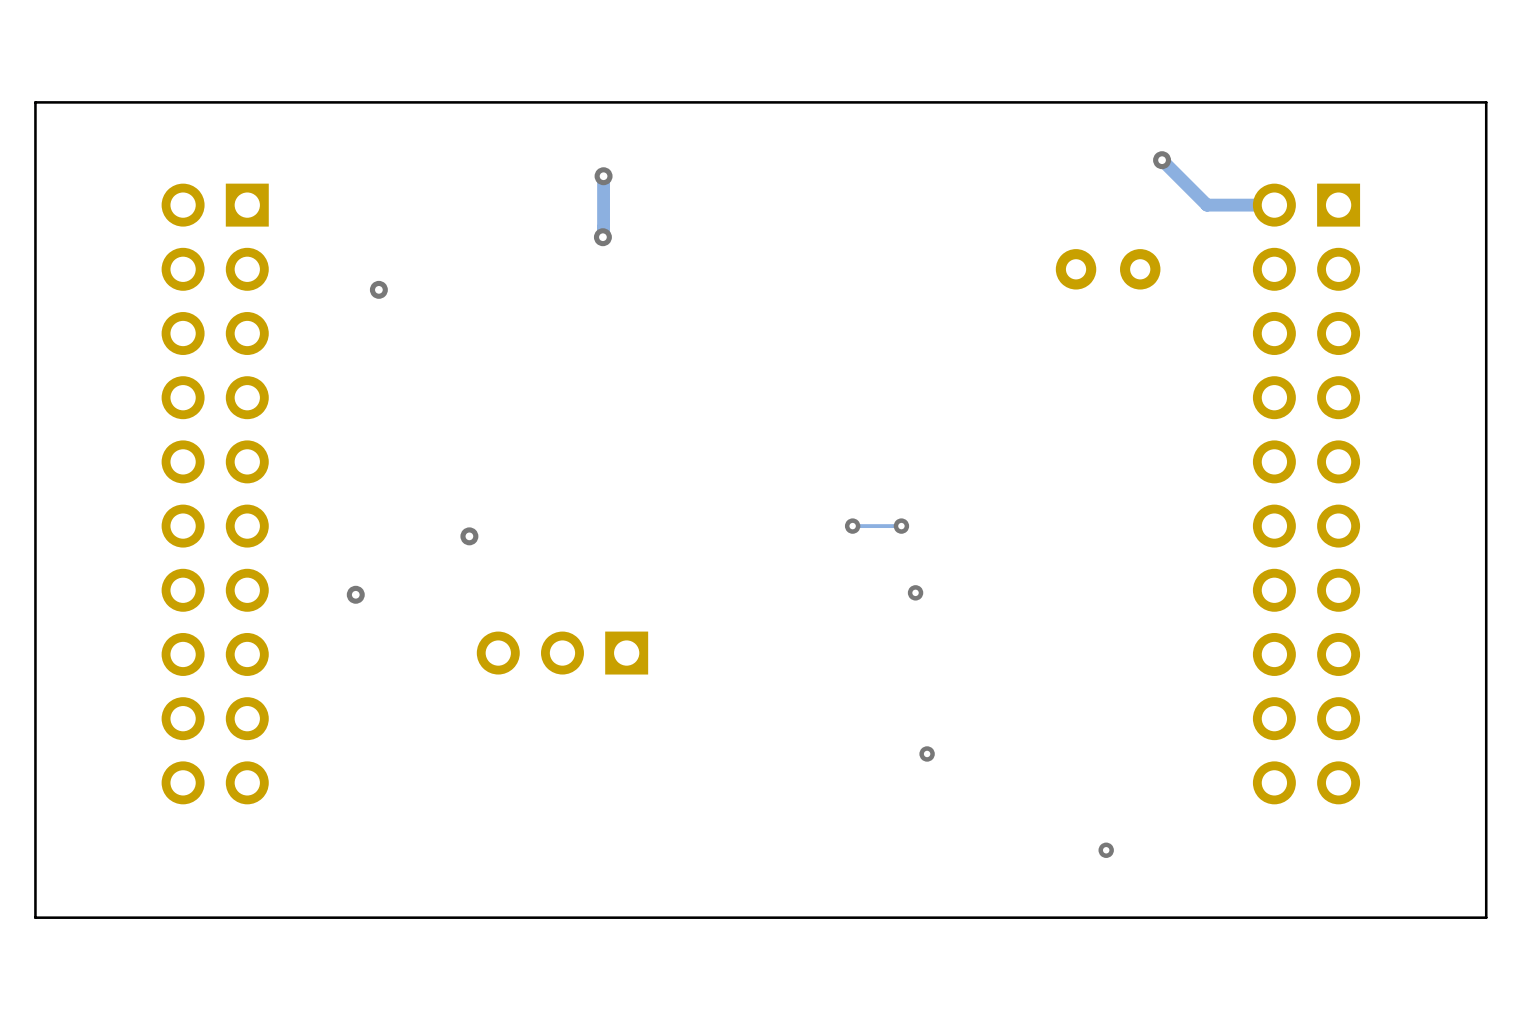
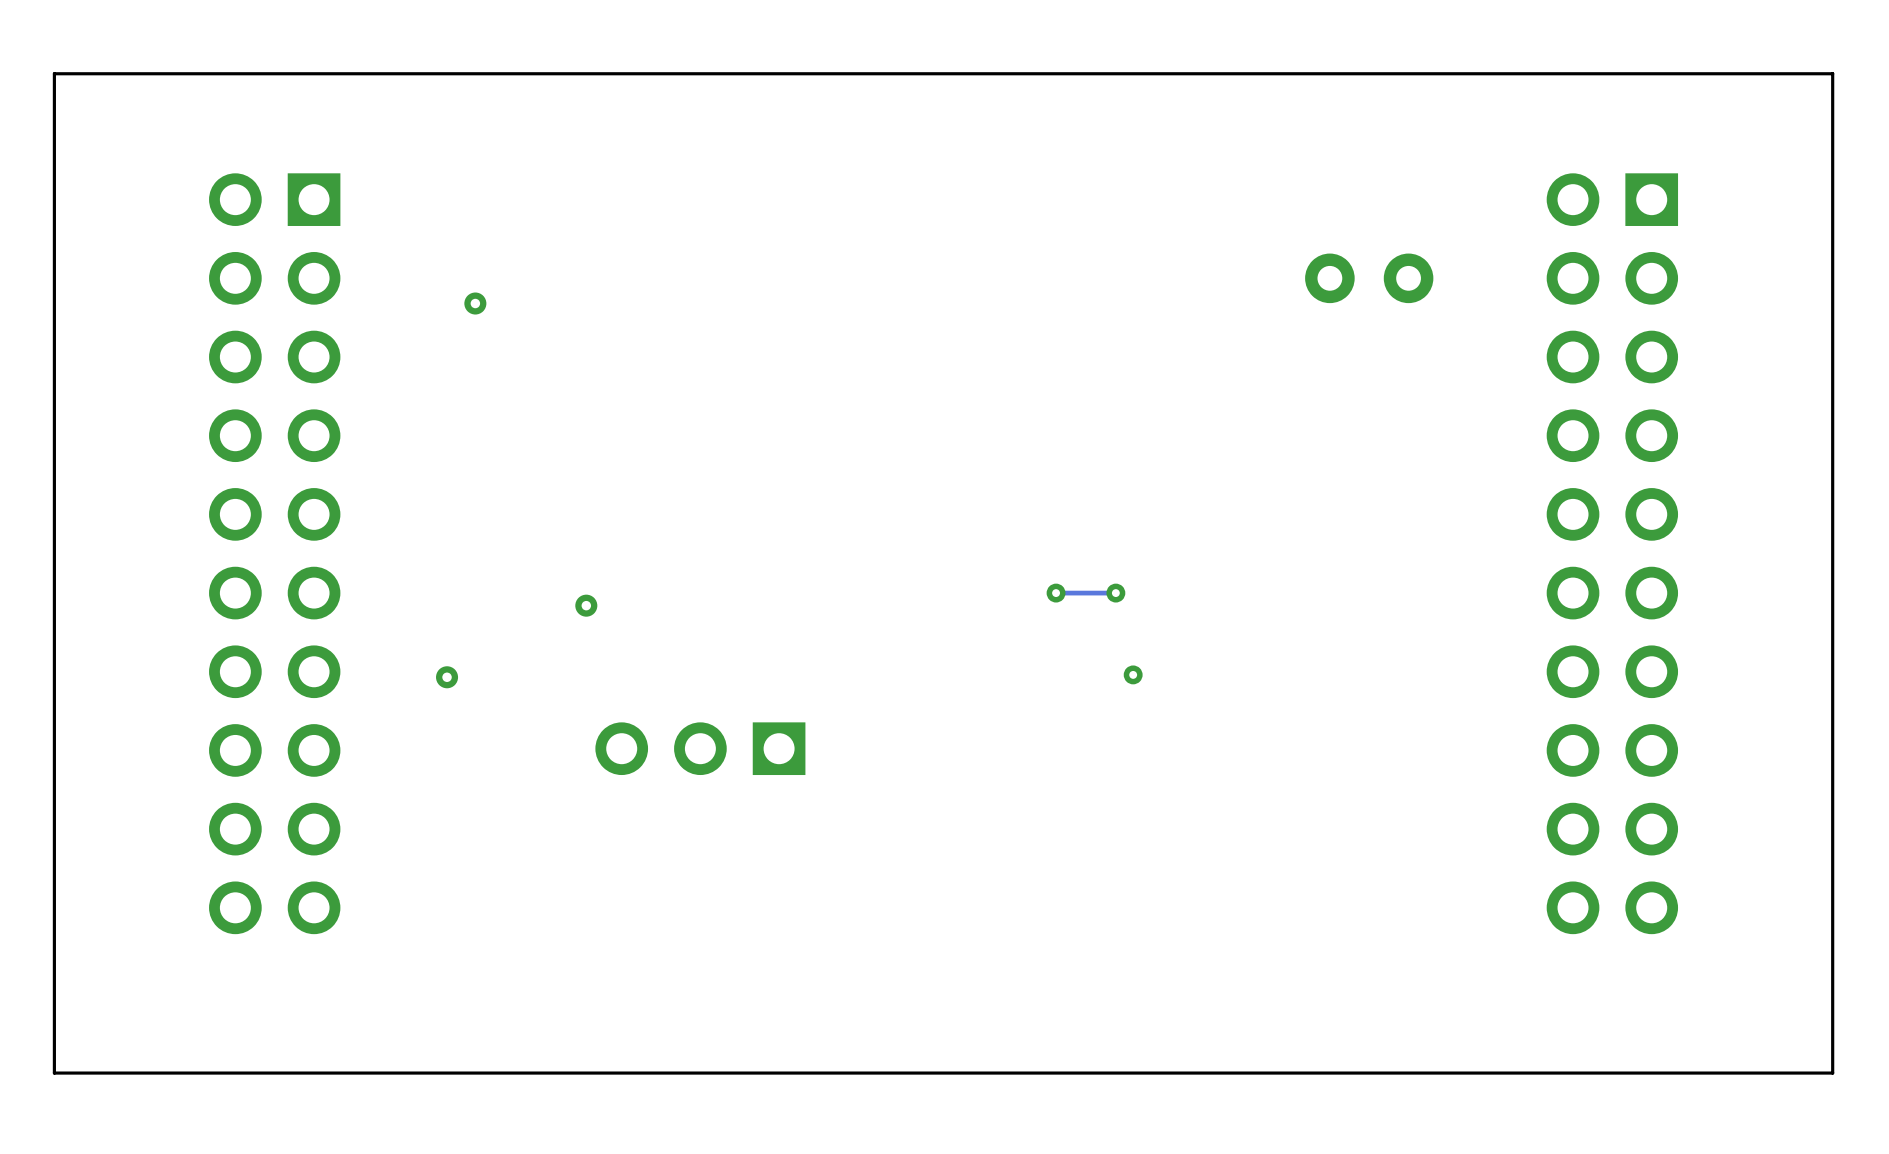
track: (1162, 160) (1206, 205) (1274, 205) -> none
via: (1162, 160) -> none
track: (603, 176) (602, 237) -> none
via: (603, 176) -> none
via: (602, 237) -> none
via: (927, 753) -> none
via: (1106, 850) -> none

